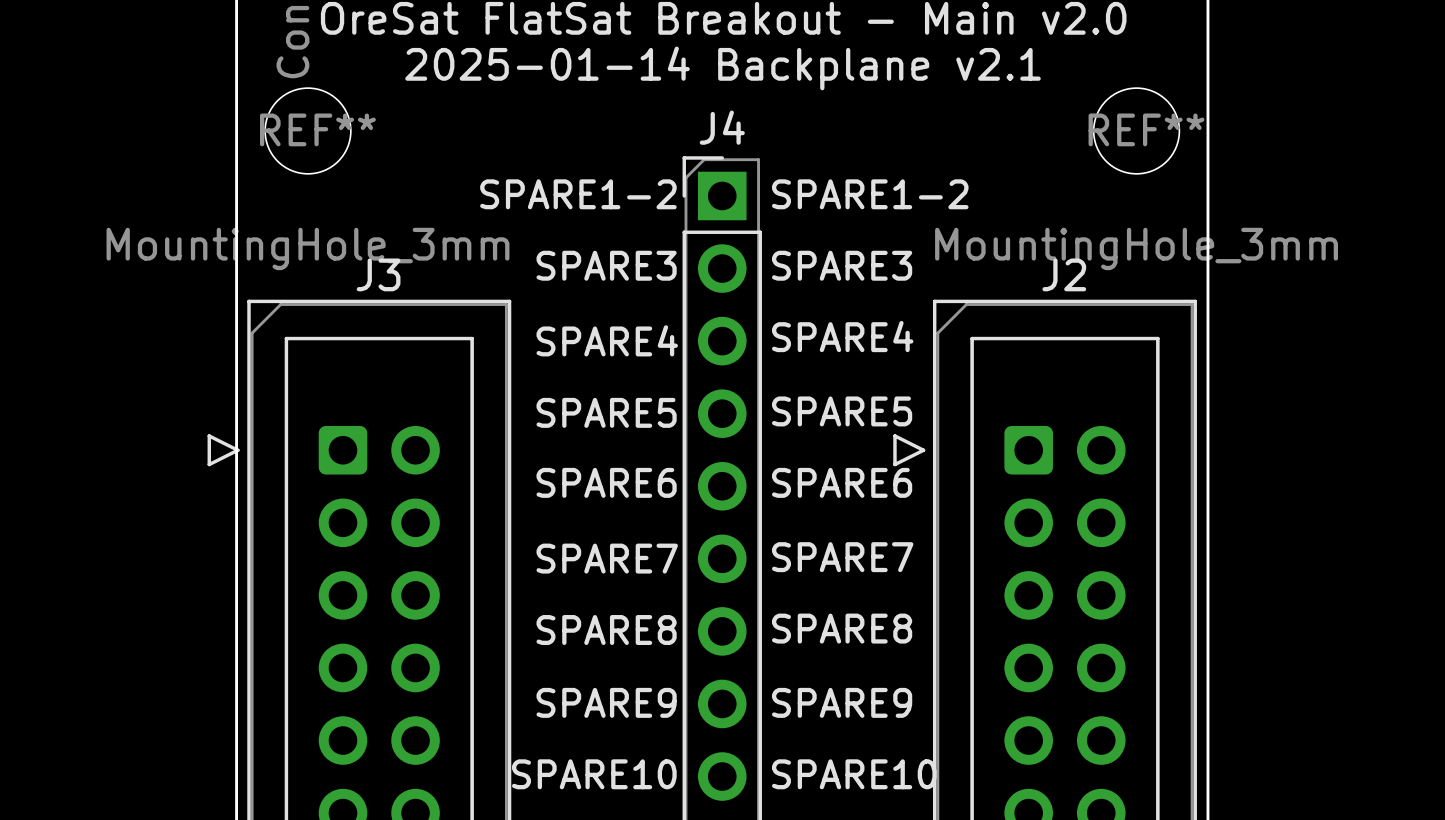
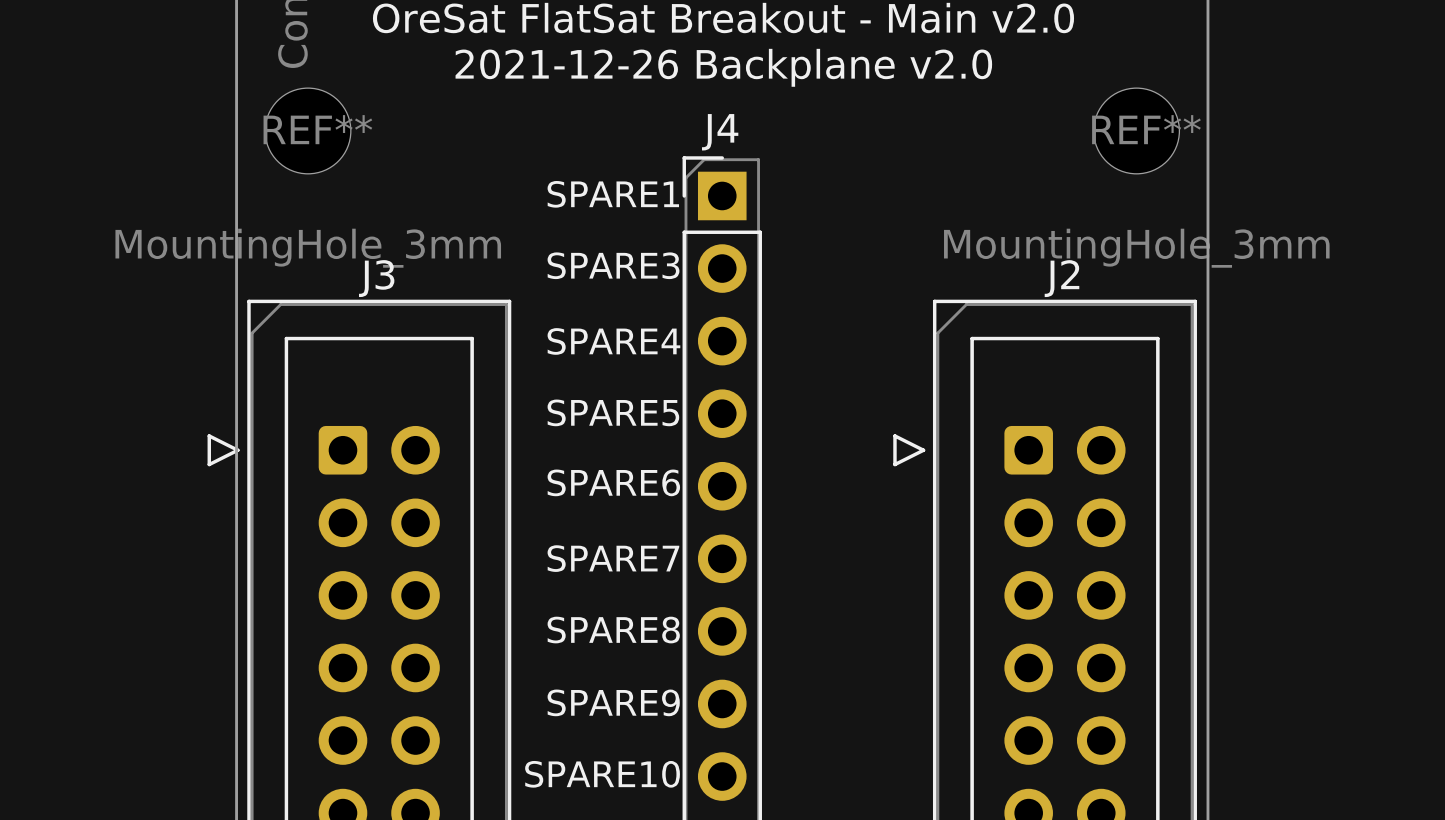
text: 2025-01-14 Backplane v2.1 (723, 68) -> 2021-12-26 Backplane v2.0 (723, 67)
text: SPARE1-2 (578, 194) -> SPARE1 (613, 194)
text: SPARE1-2 (870, 194) -> none
text: SPARE3 (842, 265) -> none
text: SPARE4 (842, 336) -> none
text: SPARE5 (842, 411) -> none
text: SPARE6 (842, 482) -> none
text: SPARE7 (842, 557) -> none
text: SPARE8 (842, 628) -> none
text: SPARE9 (842, 702) -> none
text: SPARE10 (854, 774) -> none

